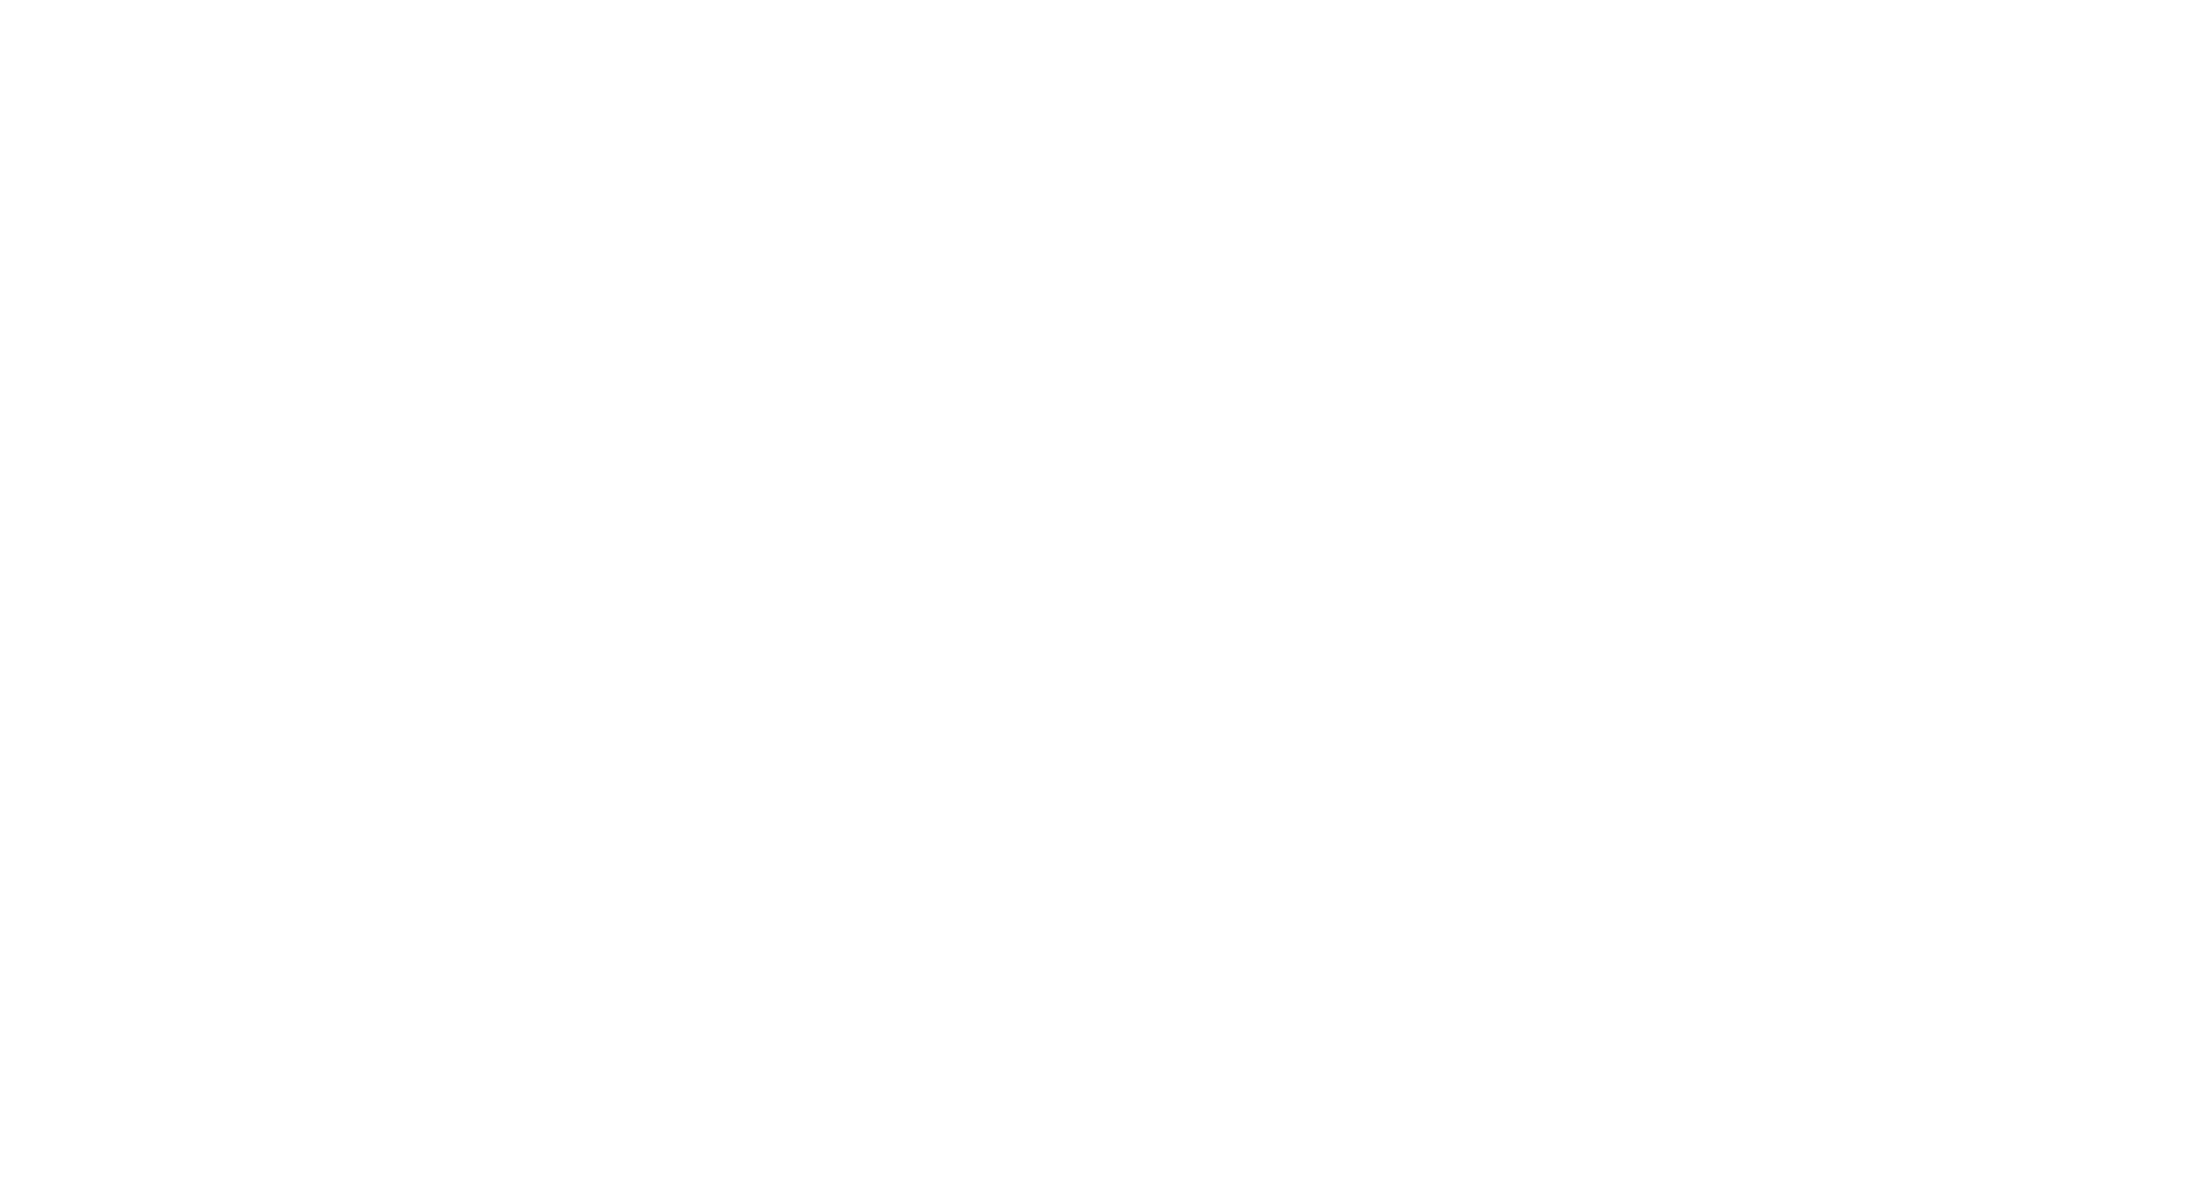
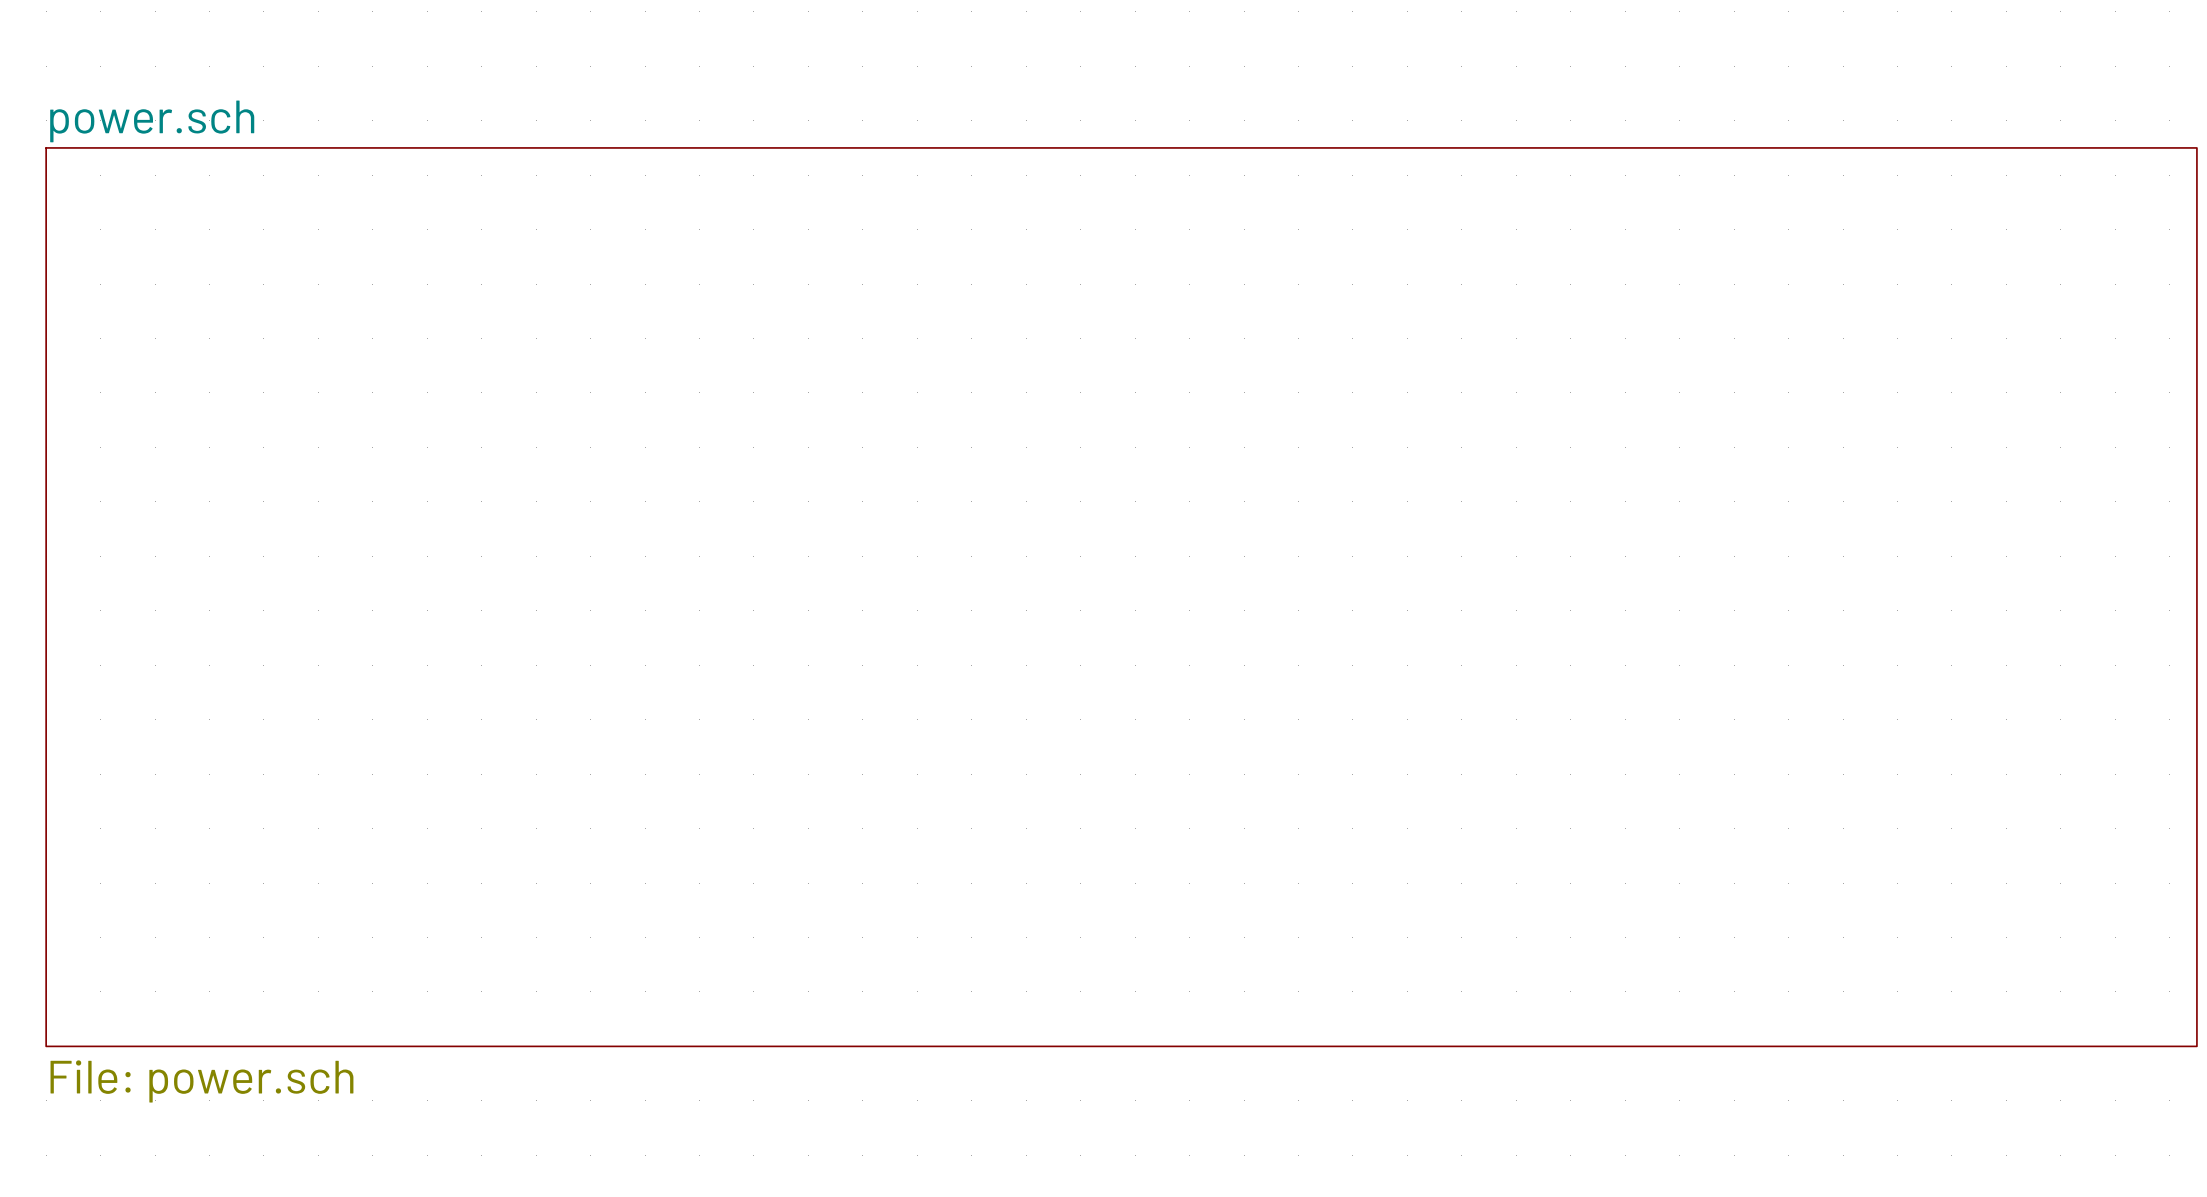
sheet power.sch: none -> File: power.sch (1121, 597)

